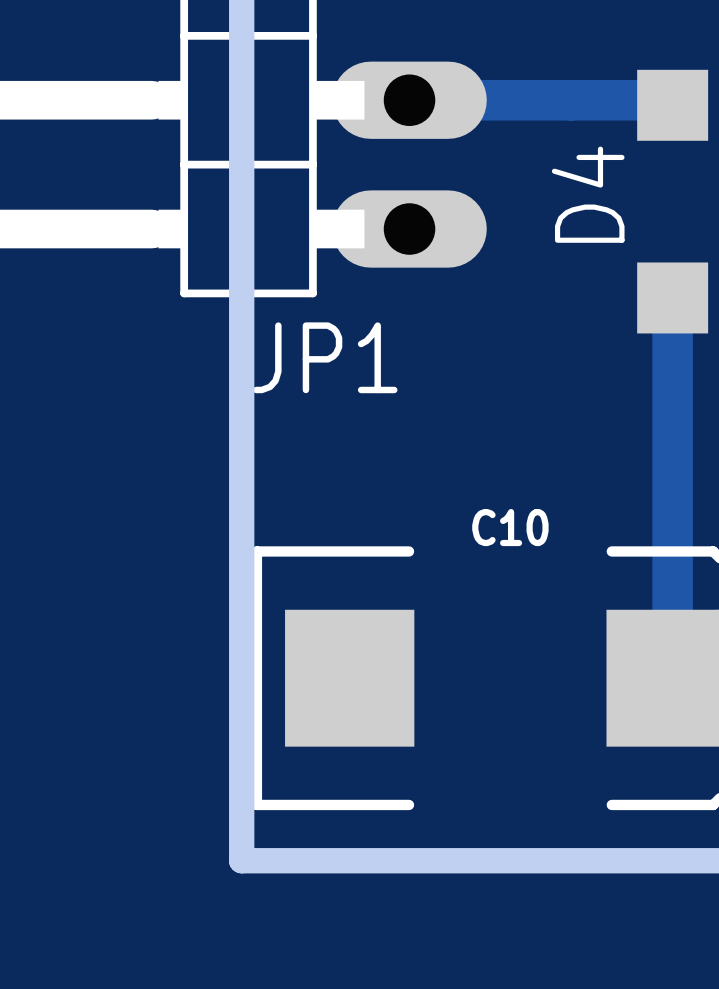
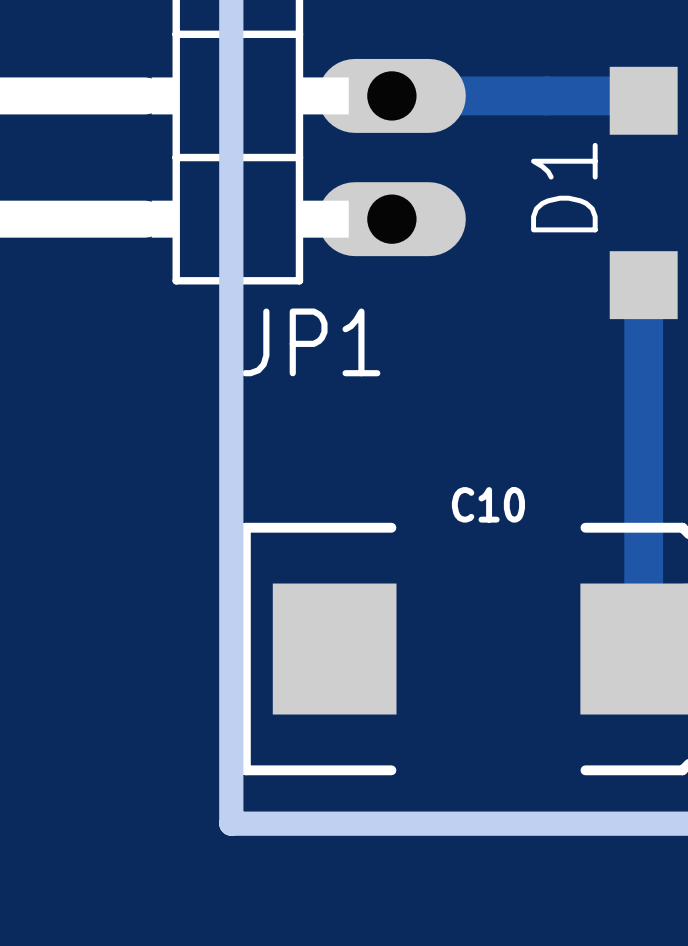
D4 name: D4 (588, 194) -> D1 (564, 187)

